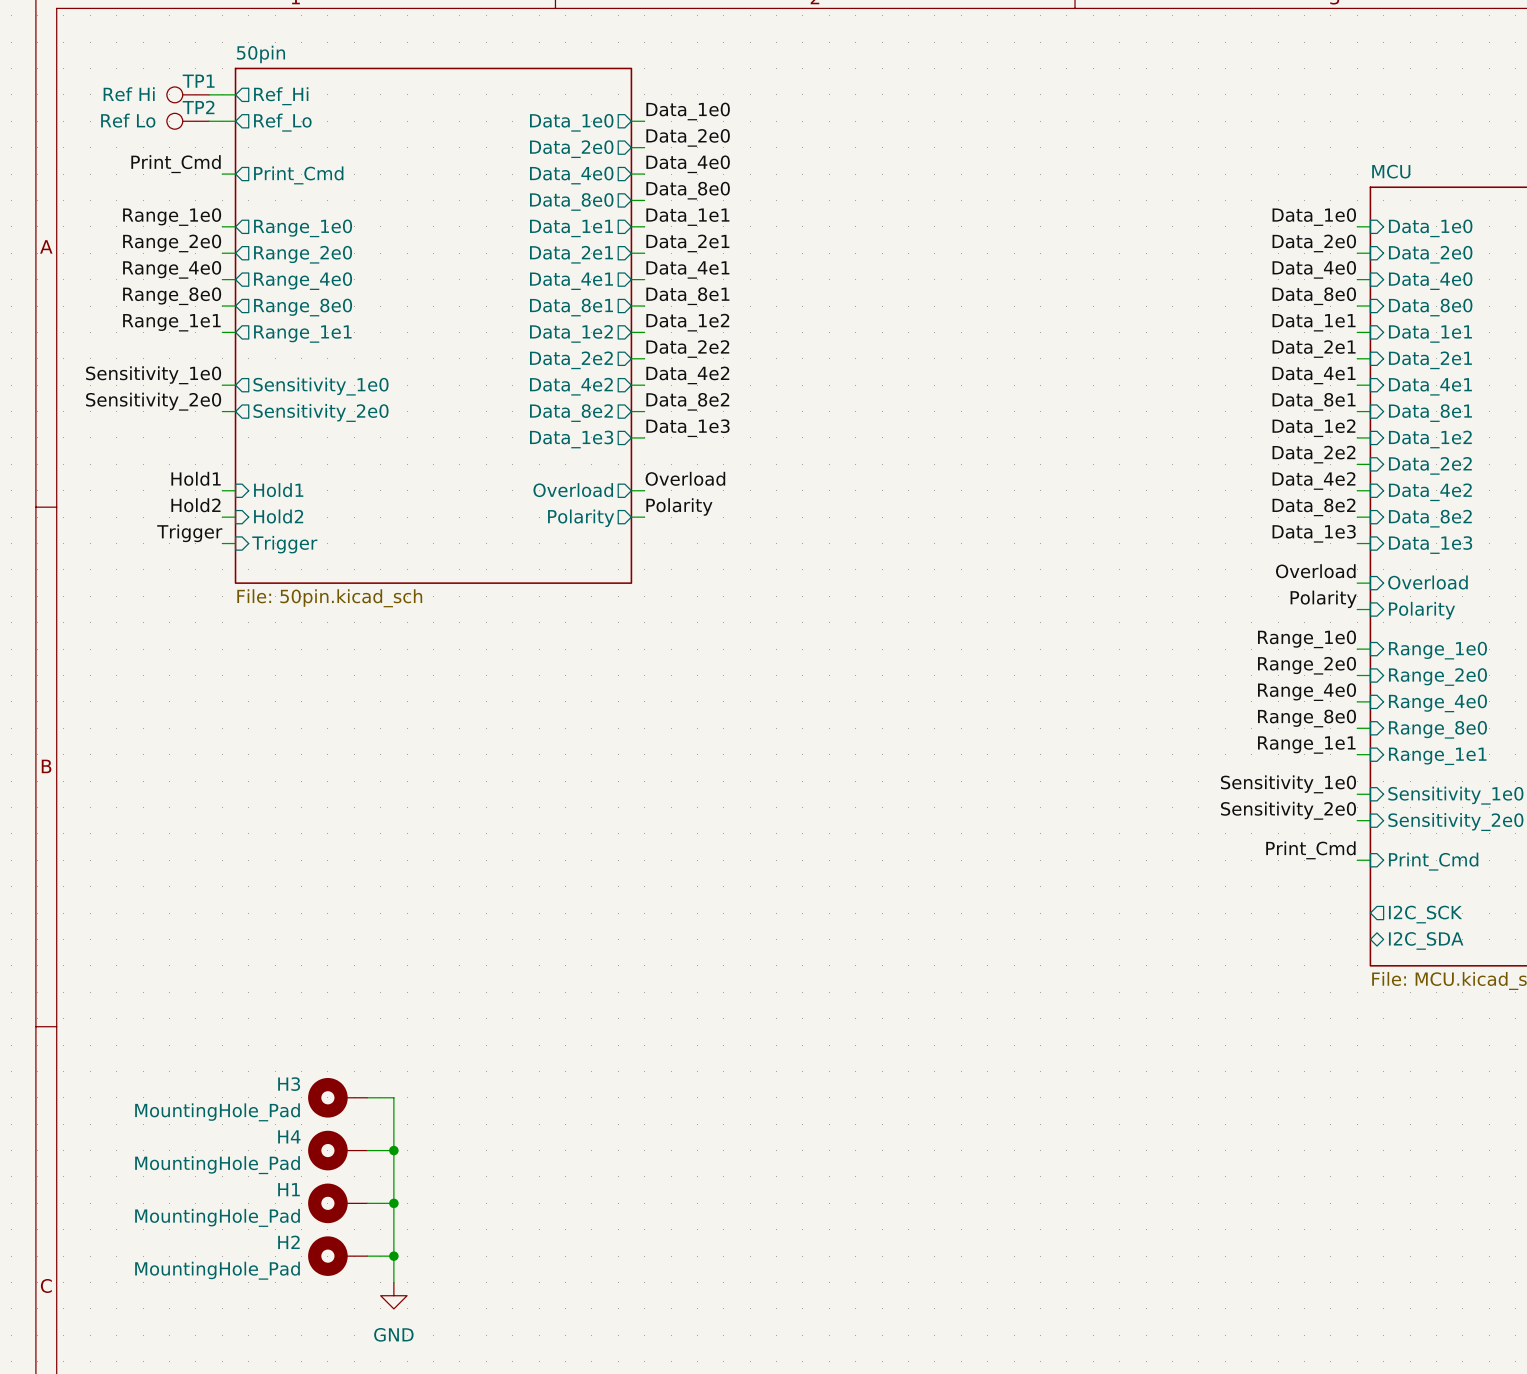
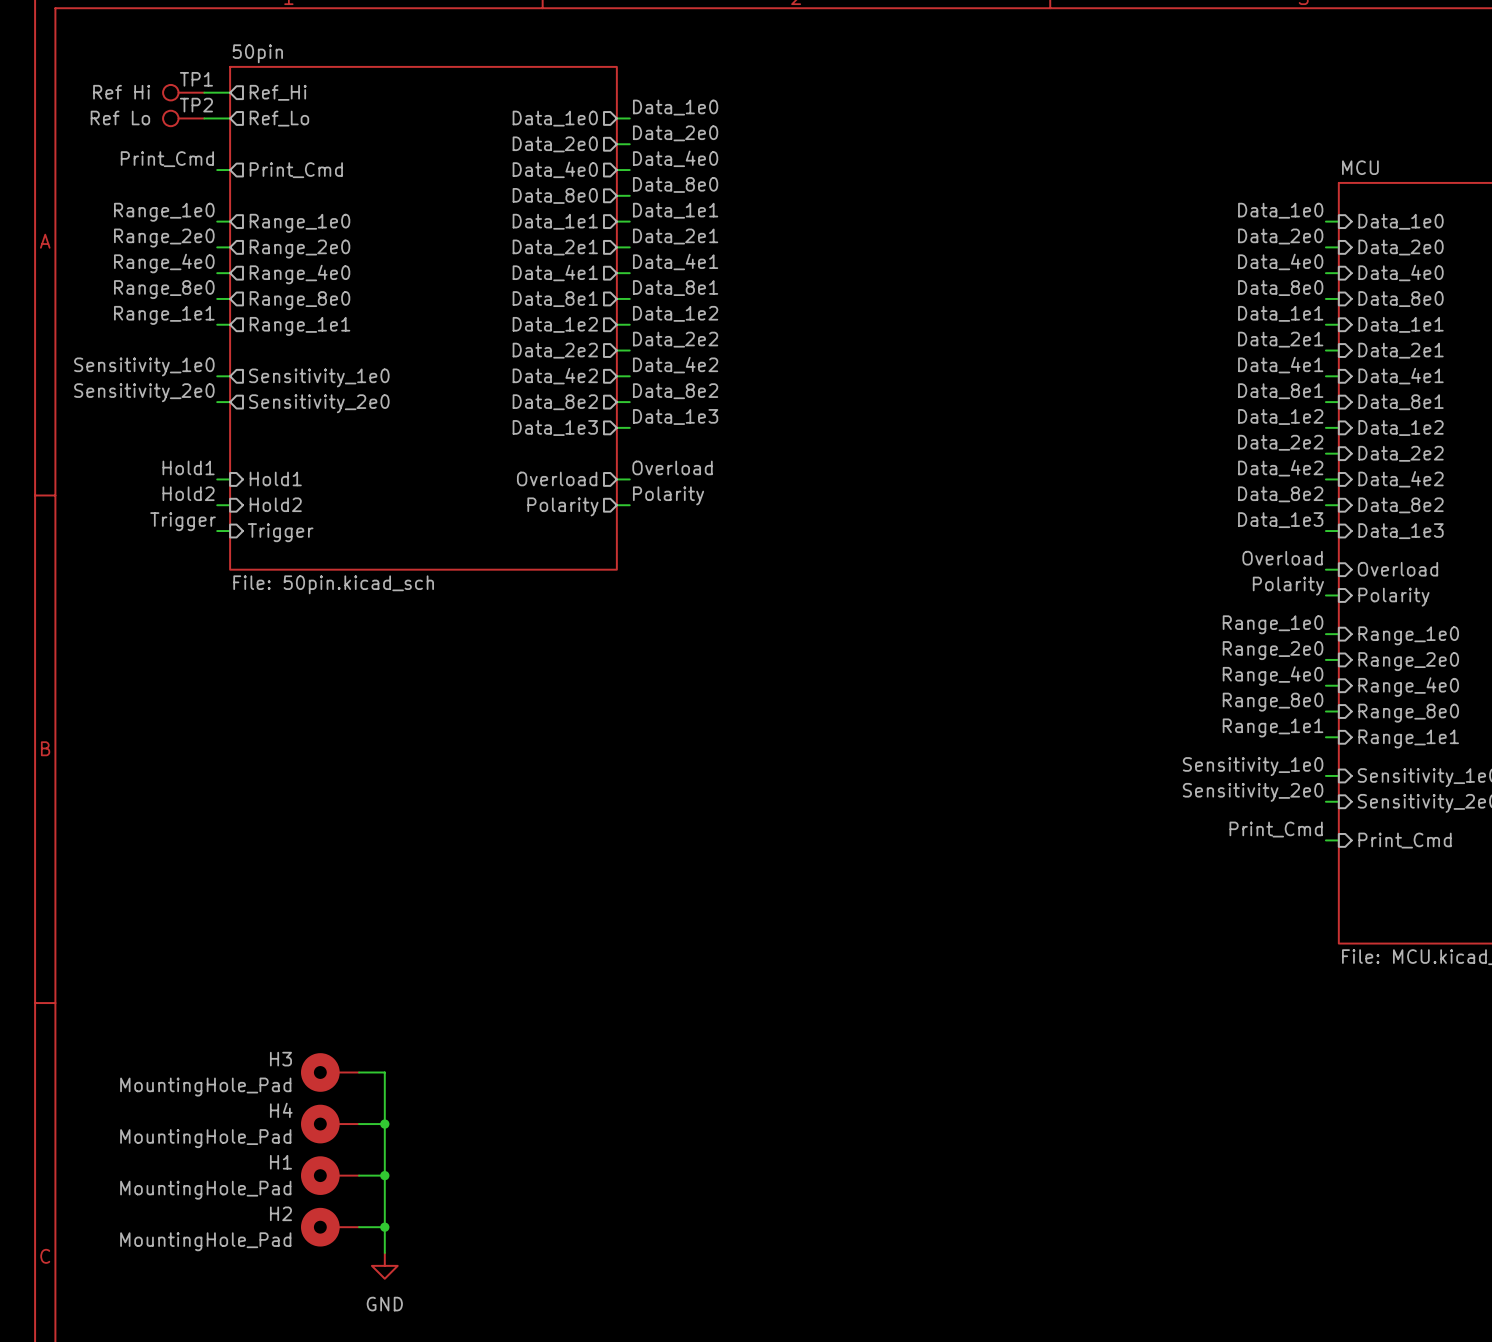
sheet pin: I2C_SCK (1425, 914) -> none
sheet pin: I2C_SDA (1426, 940) -> none

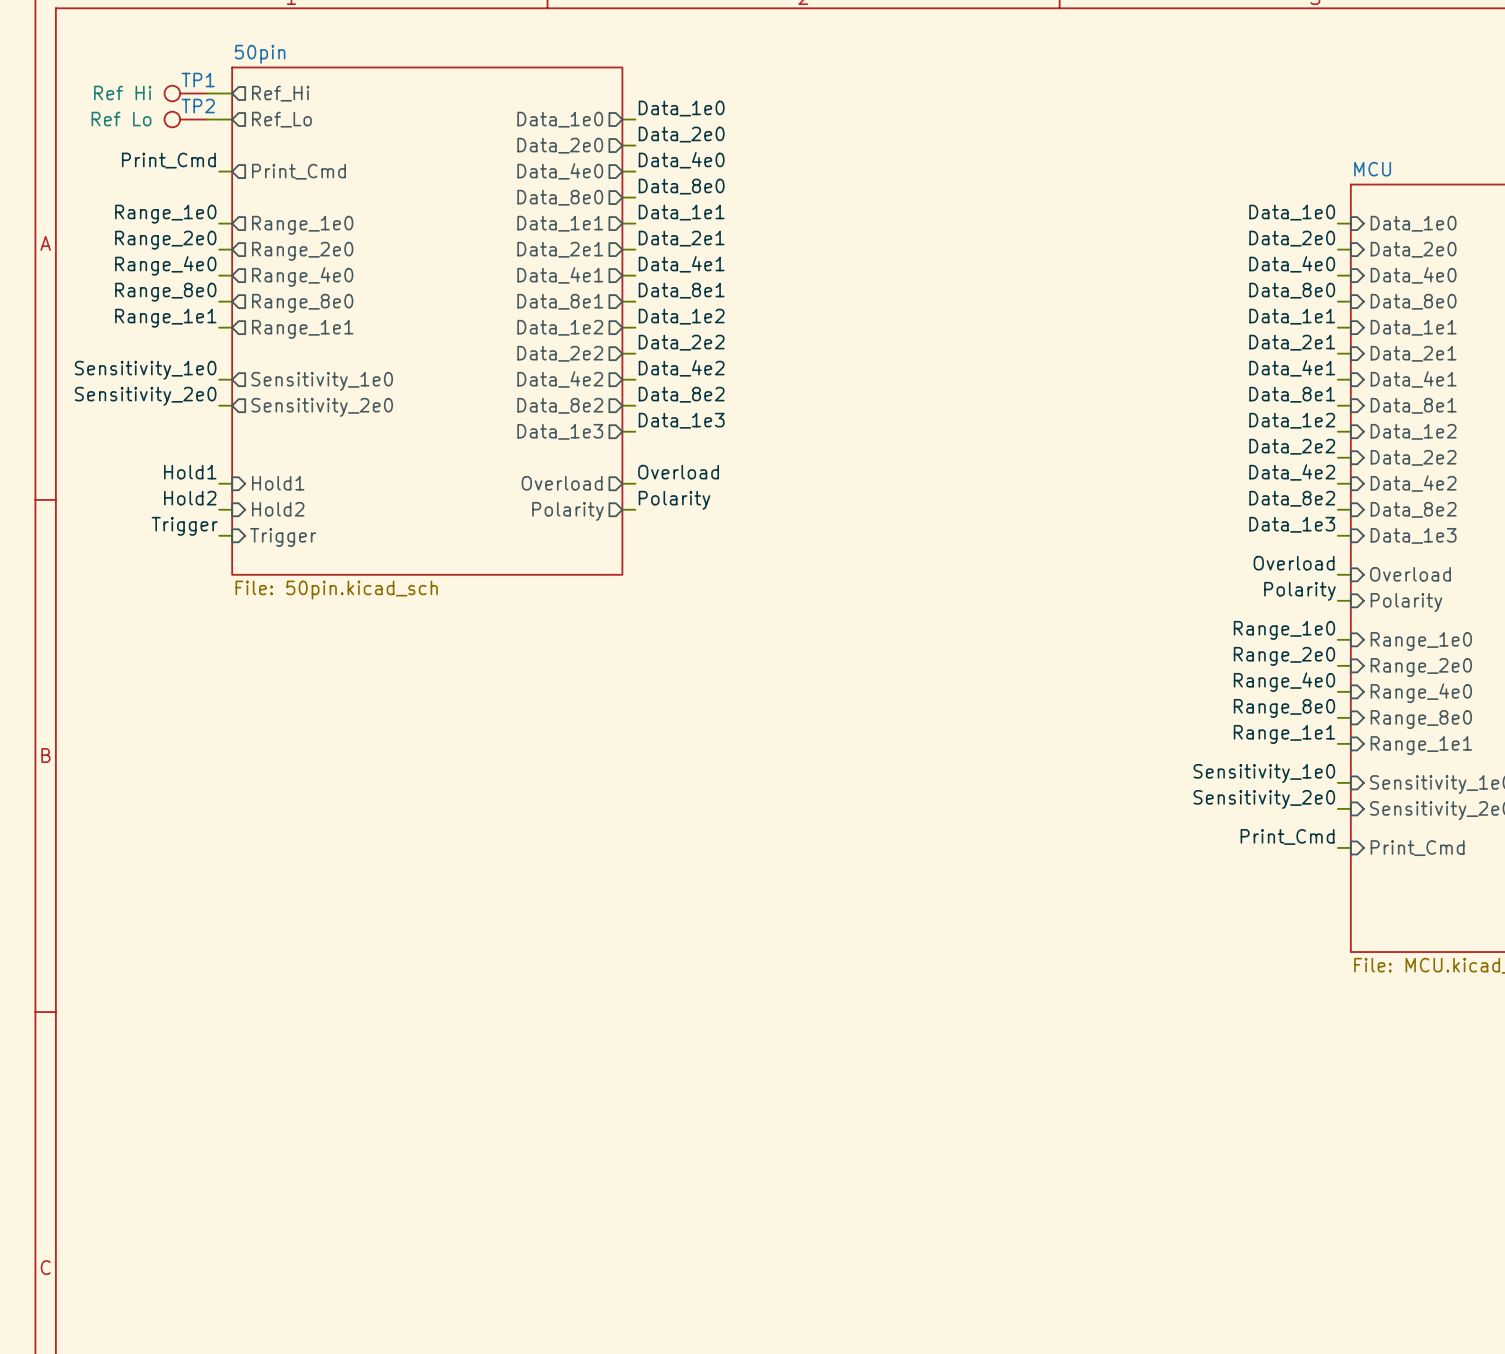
H3: MountingHole_Pad (330, 1072) -> none
wire: (359, 1072) (384, 1072) (384, 1252) -> none
H4: MountingHole_Pad (330, 1124) -> none
wire: (359, 1124) (384, 1124) -> none
junction: (384, 1124) -> none
H1: MountingHole_Pad (330, 1175) -> none
wire: (359, 1175) (384, 1175) -> none
junction: (384, 1175) -> none
H2: MountingHole_Pad (330, 1227) -> none
wire: (359, 1227) (384, 1227) -> none
junction: (384, 1227) -> none
power symbol: GND (384, 1265) -> none

